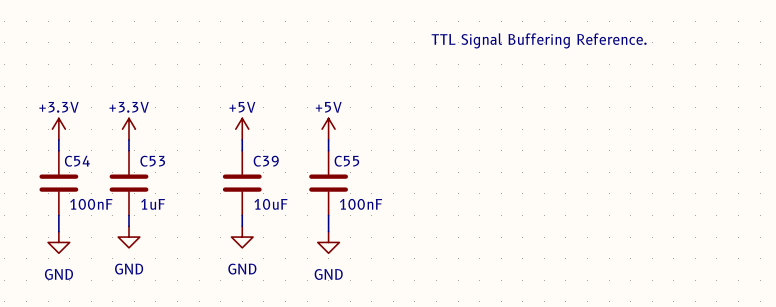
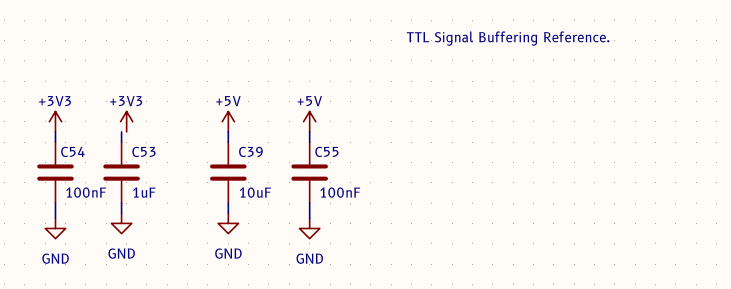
power symbol: +3.3V (58, 129) -> +3V3 (55, 121)
power symbol: +3.3V (128, 129) -> +3V3 (126, 121)

